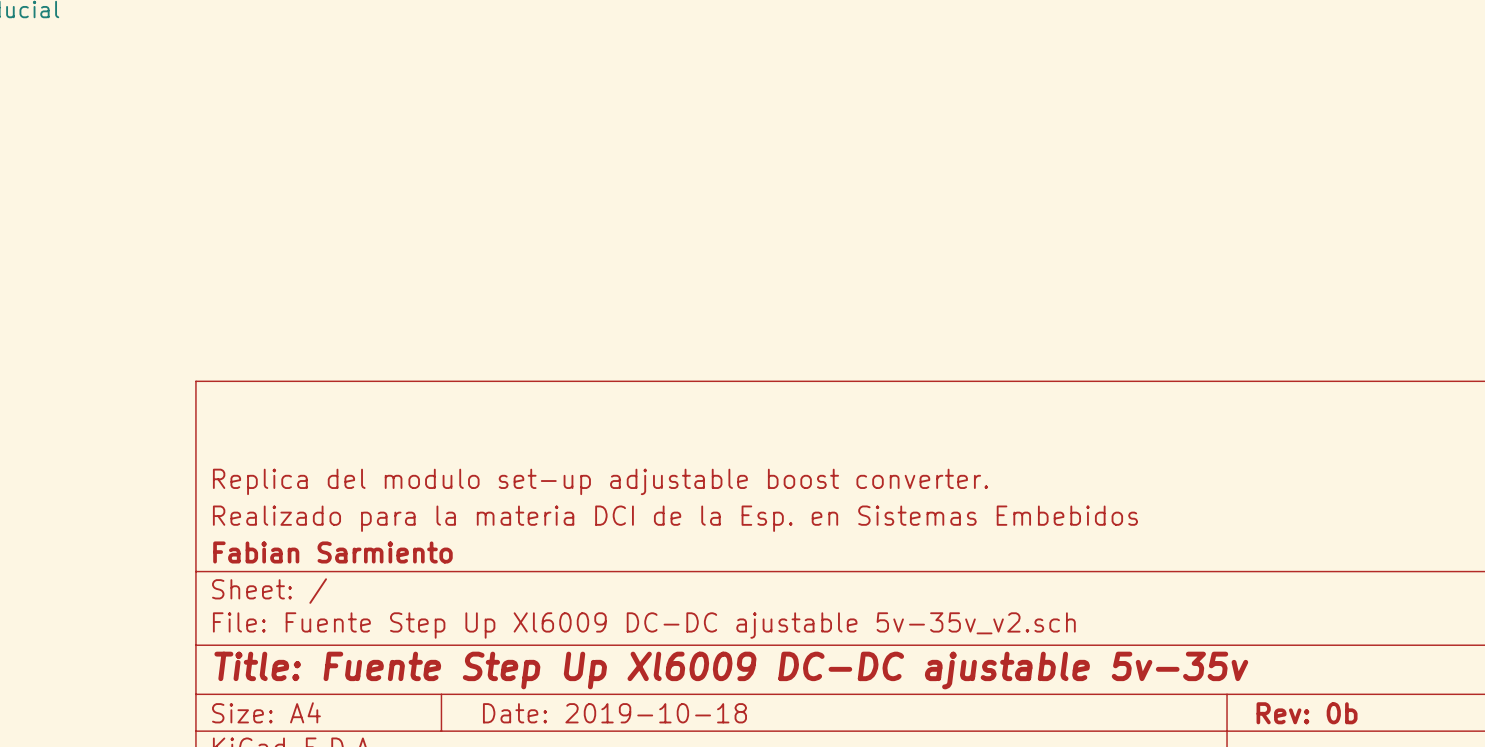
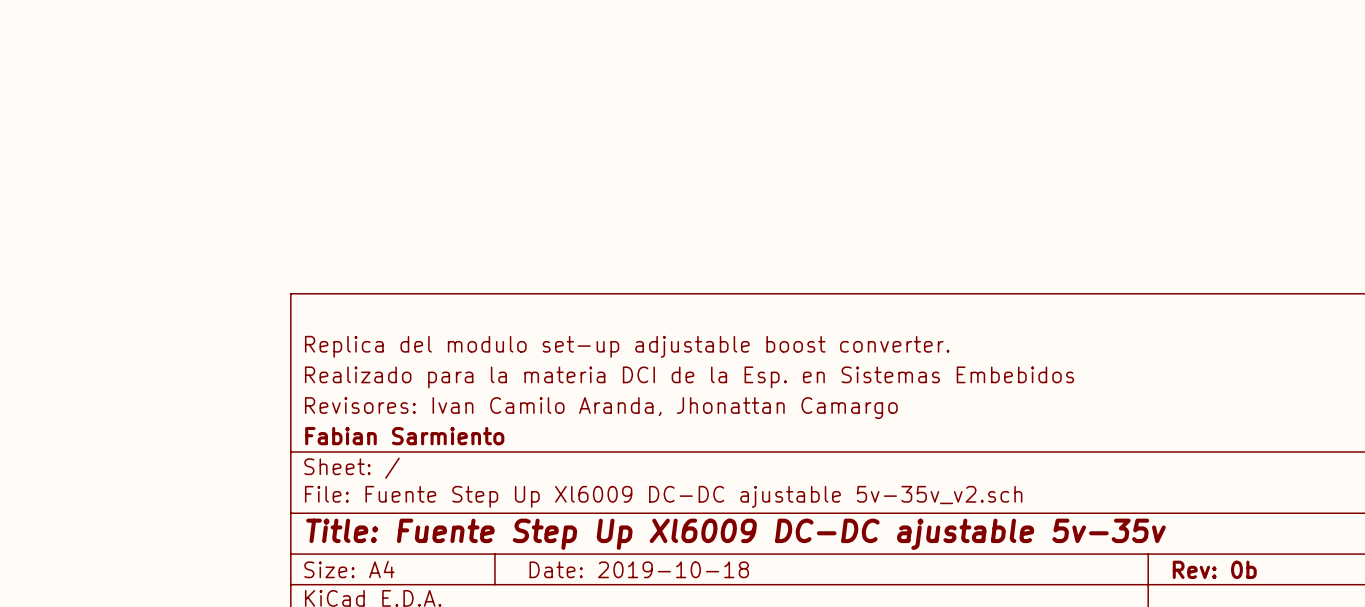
title block: none -> Replica del modulo set-up adjustable boost converter. (627, 346)
title block: Replica del modulo set-up adjustable boost converter. (600, 481) -> Realizado para la materia DCI de la Esp. en Sistemas Embebidos (689, 377)
title block: Realizado para la materia DCI de la Esp. en Sistemas Embebidos (675, 518) -> Revisores: Ivan Camilo Aranda, Jhonattan Camargo (601, 408)

